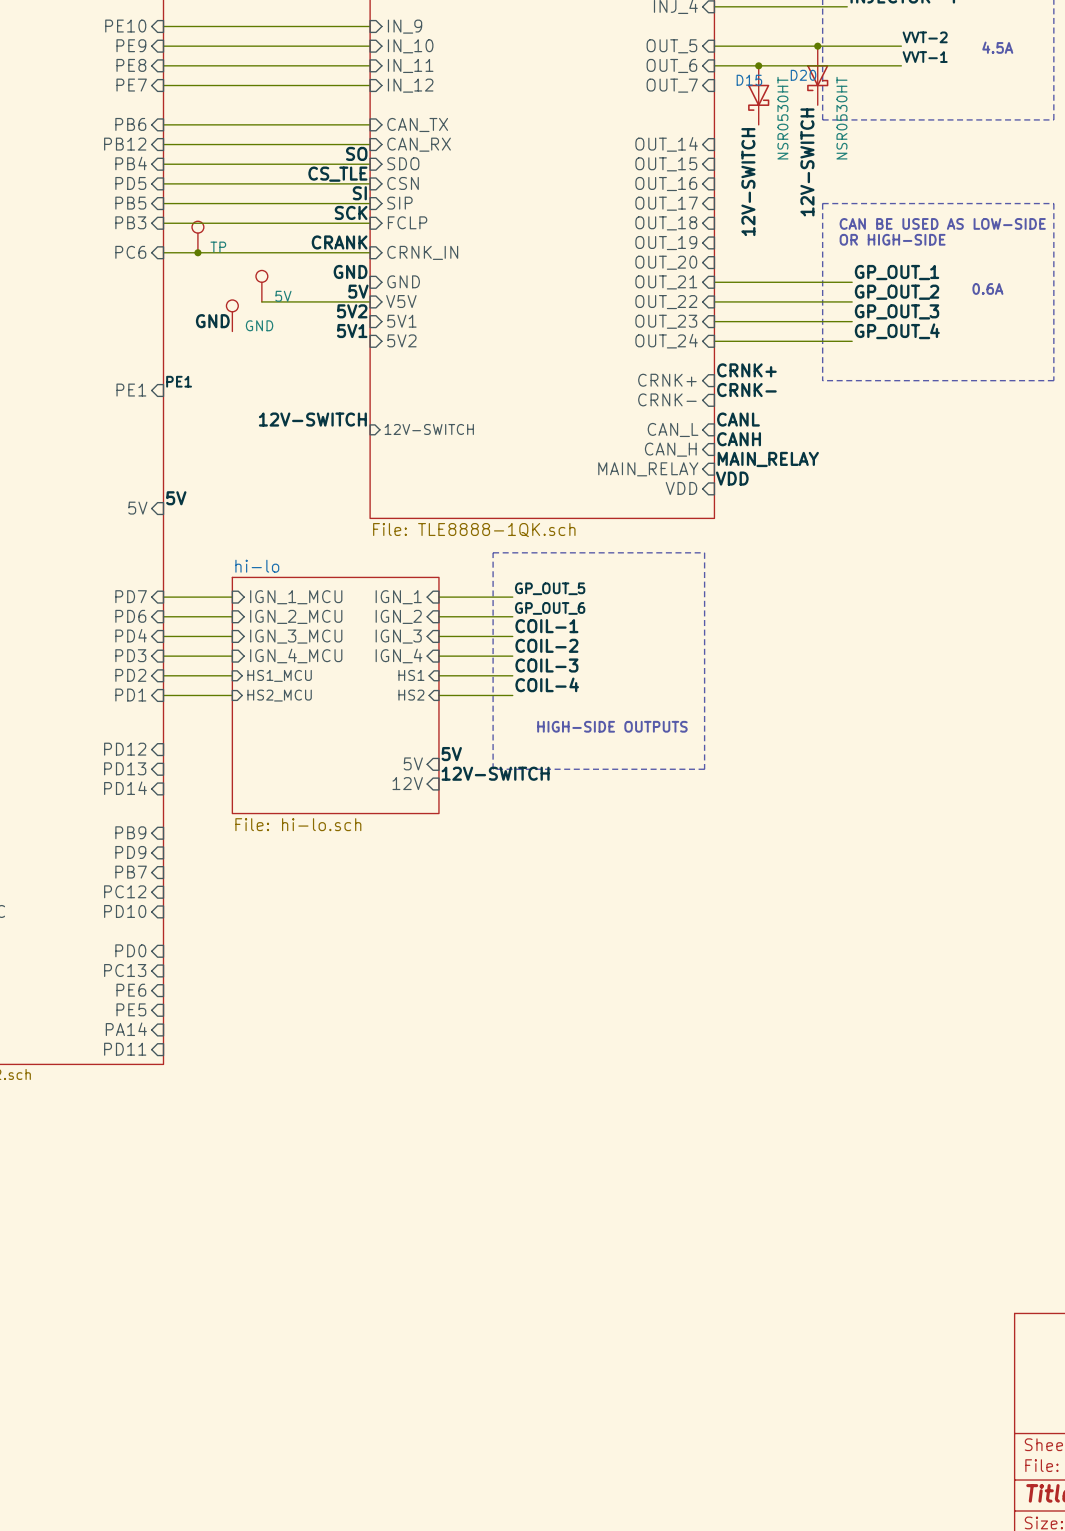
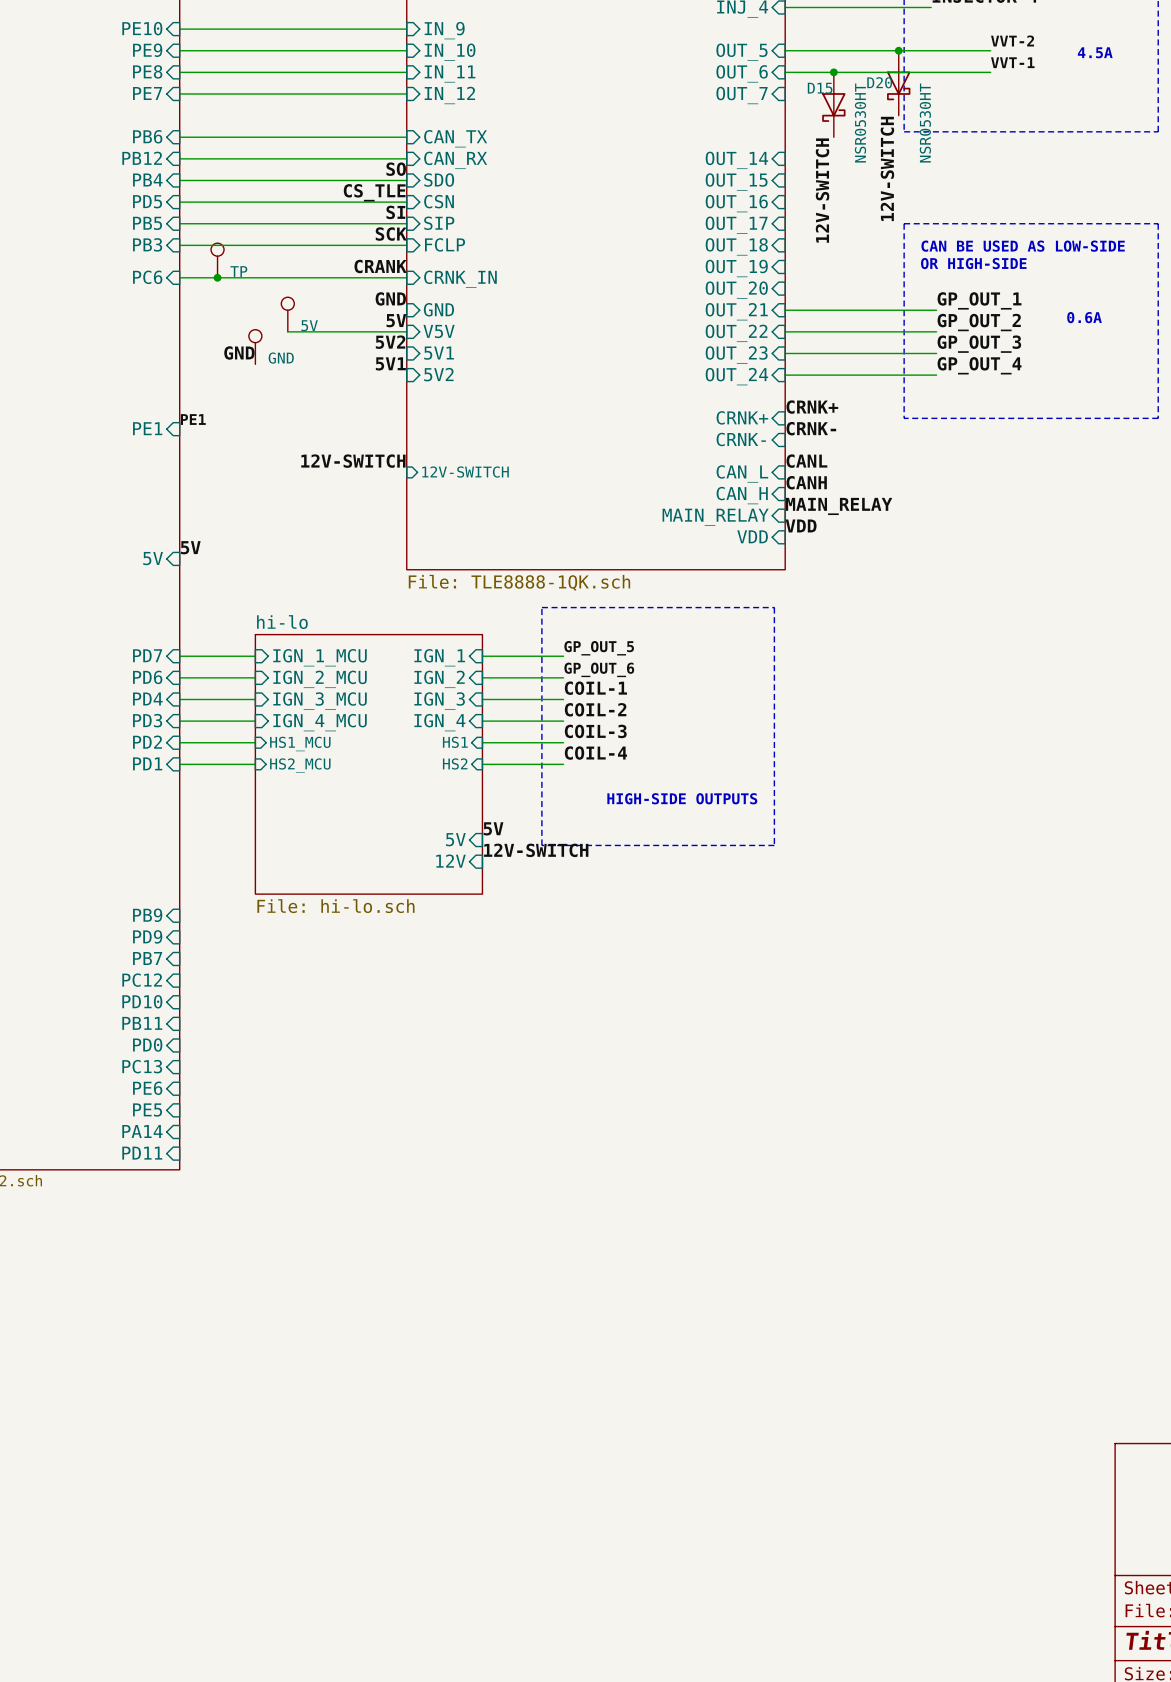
sheet pin: PD12 (125, 749) -> none
sheet pin: PD13 (125, 768) -> none
sheet pin: PD14 (125, 788) -> none
sheet pin: none -> PB11 (142, 1023)

